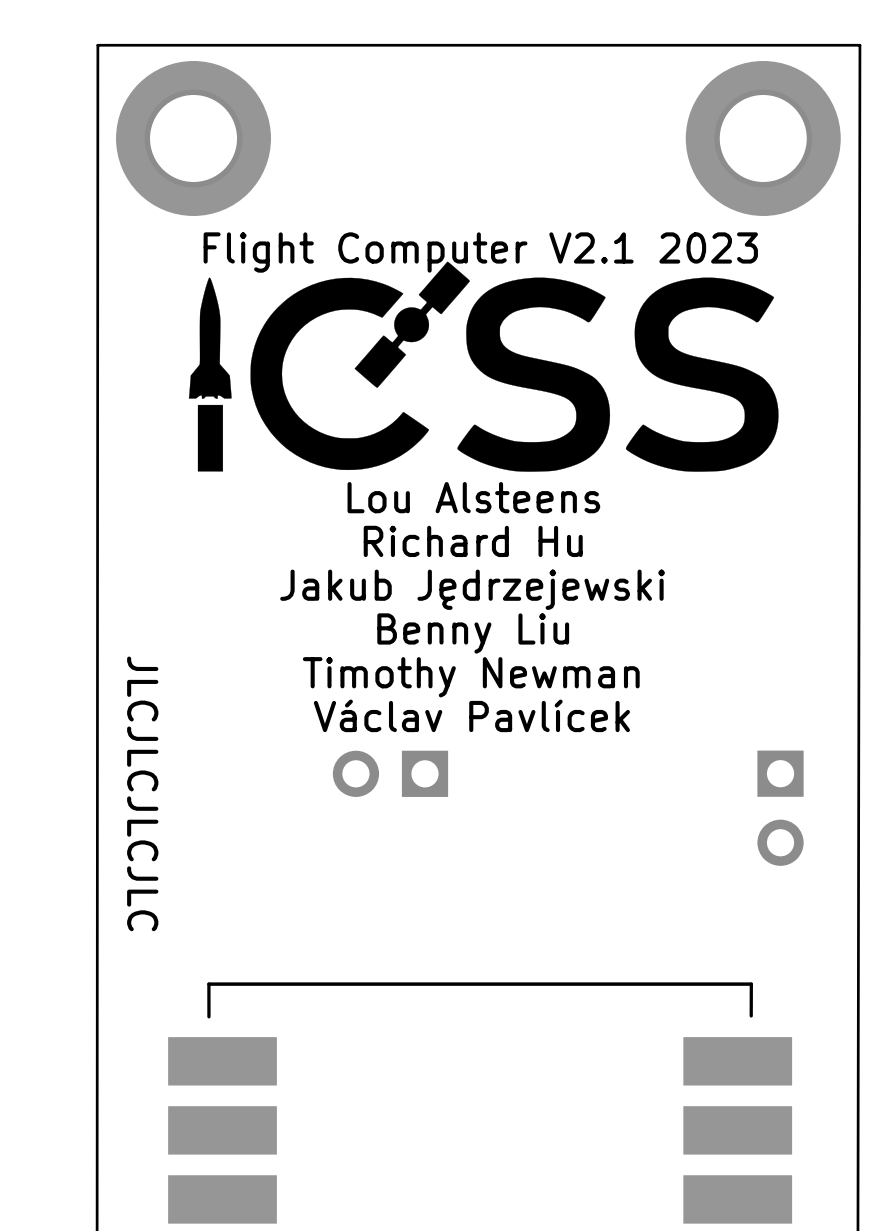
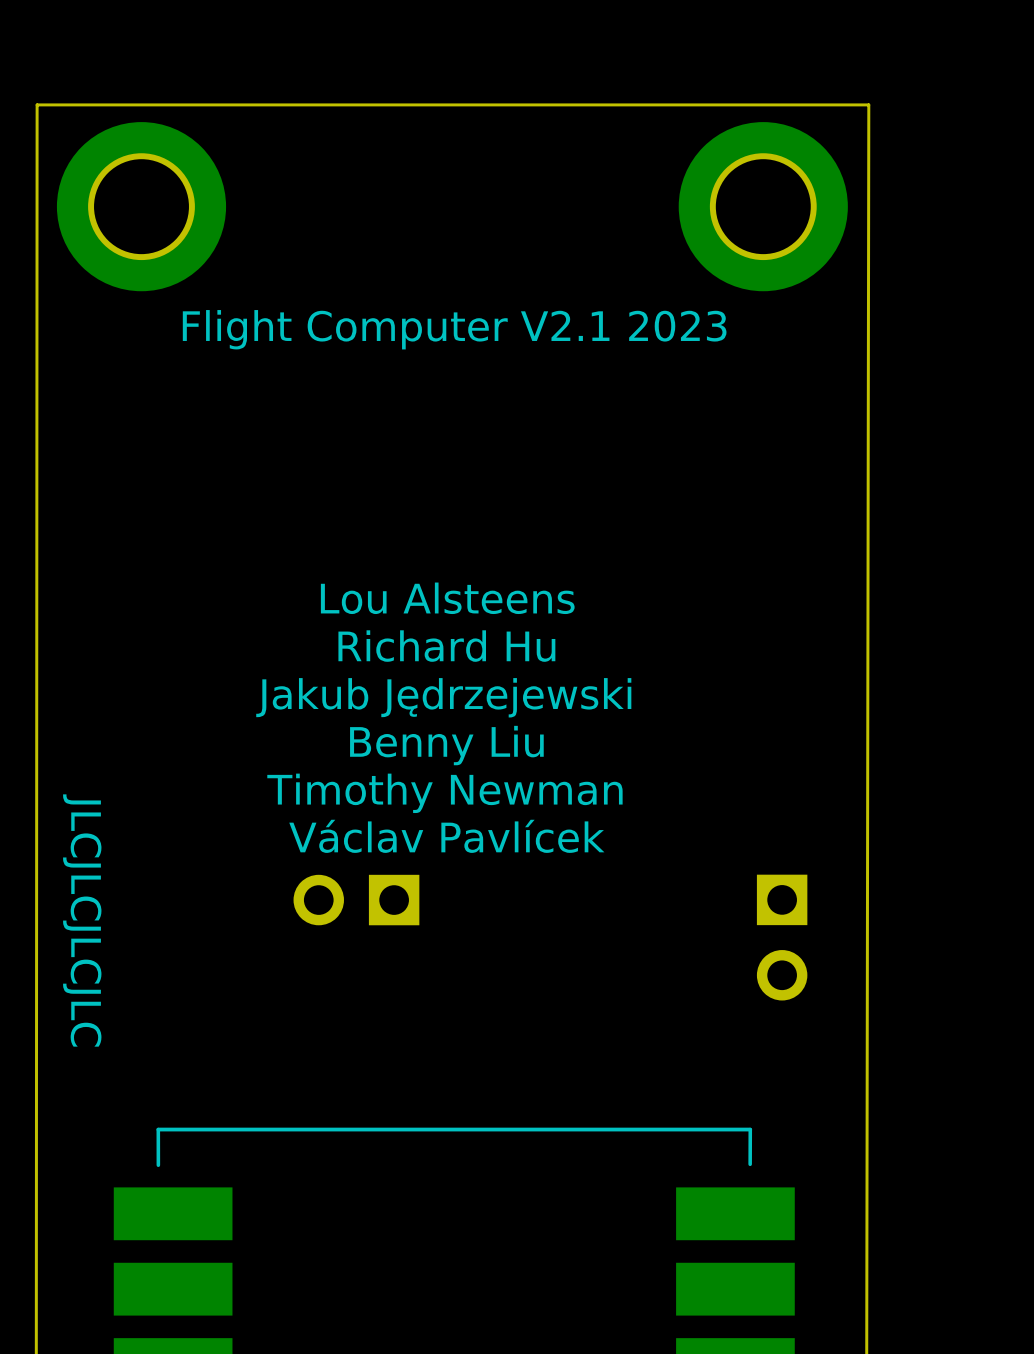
drawing: [188, 261, 779, 472] -> none

